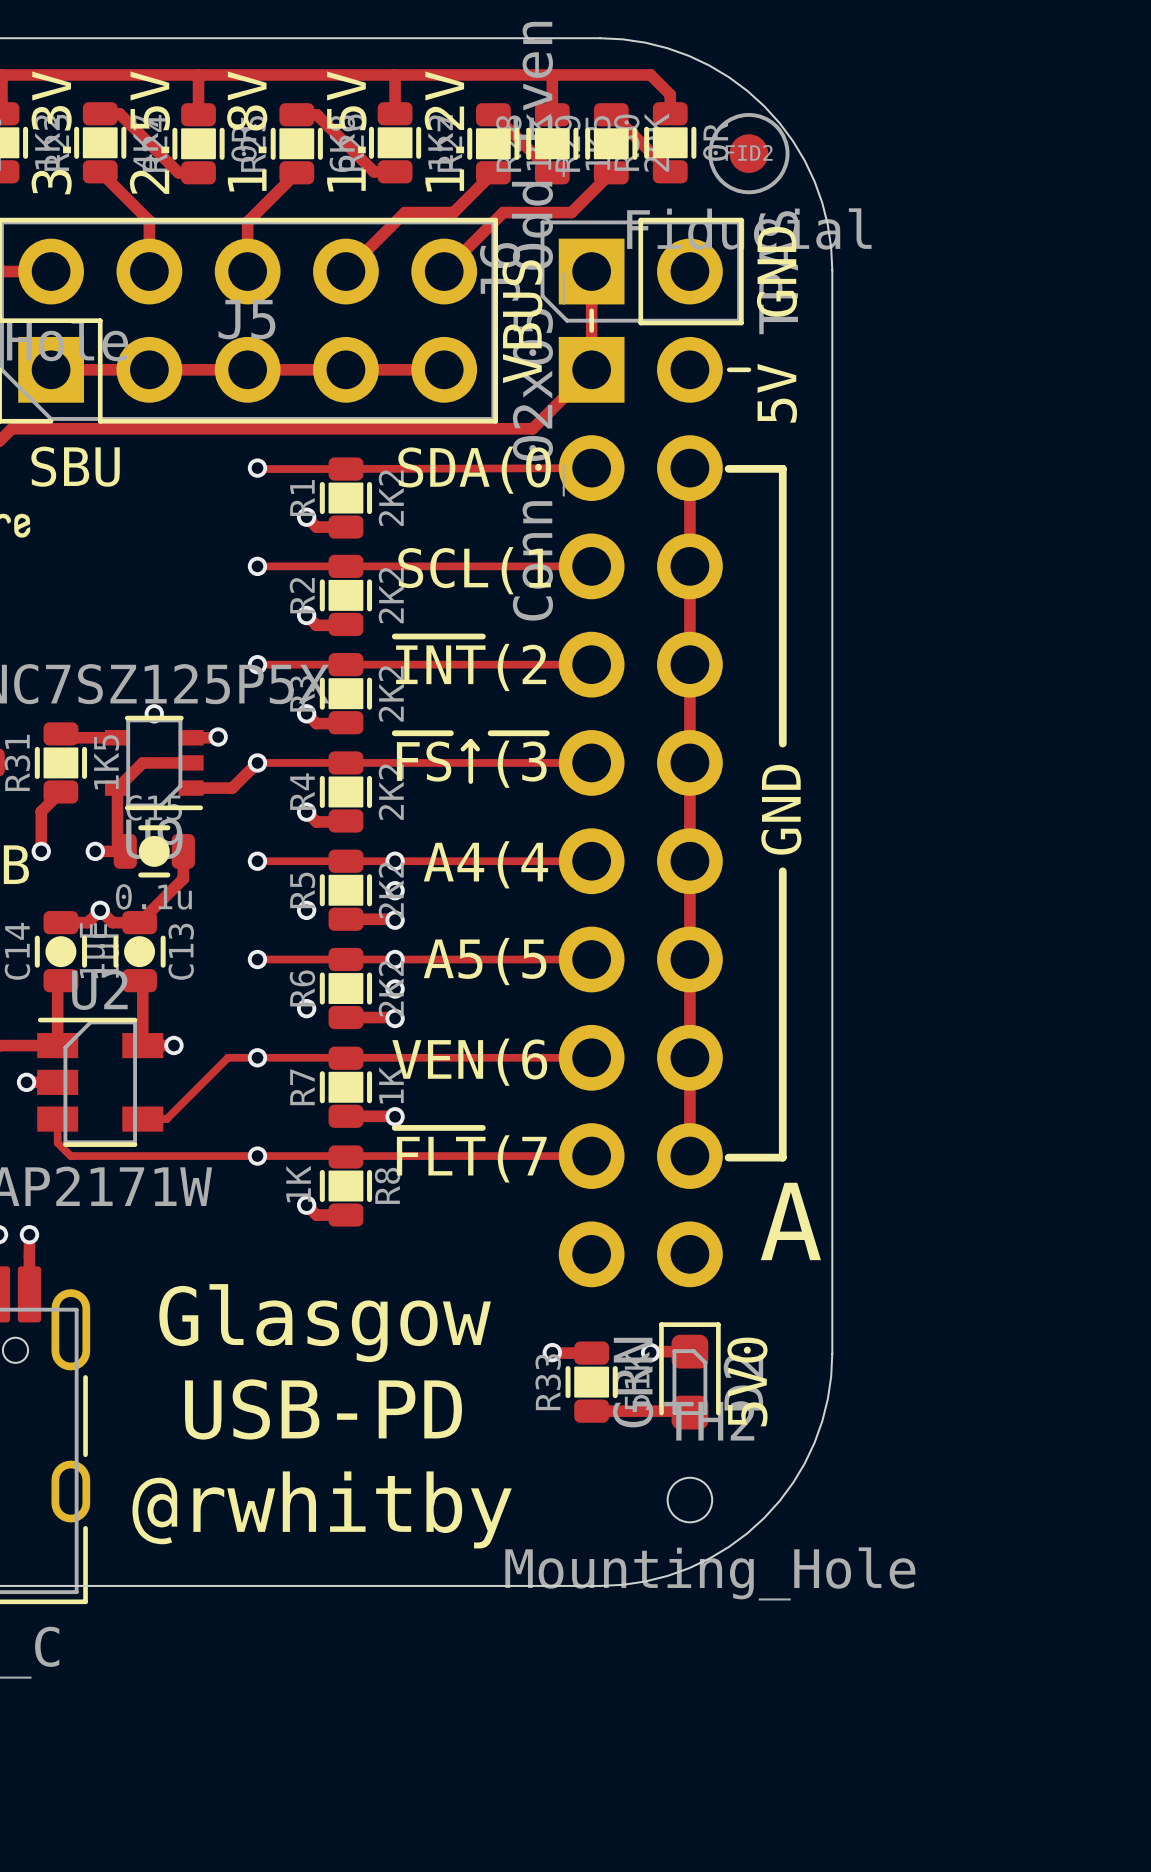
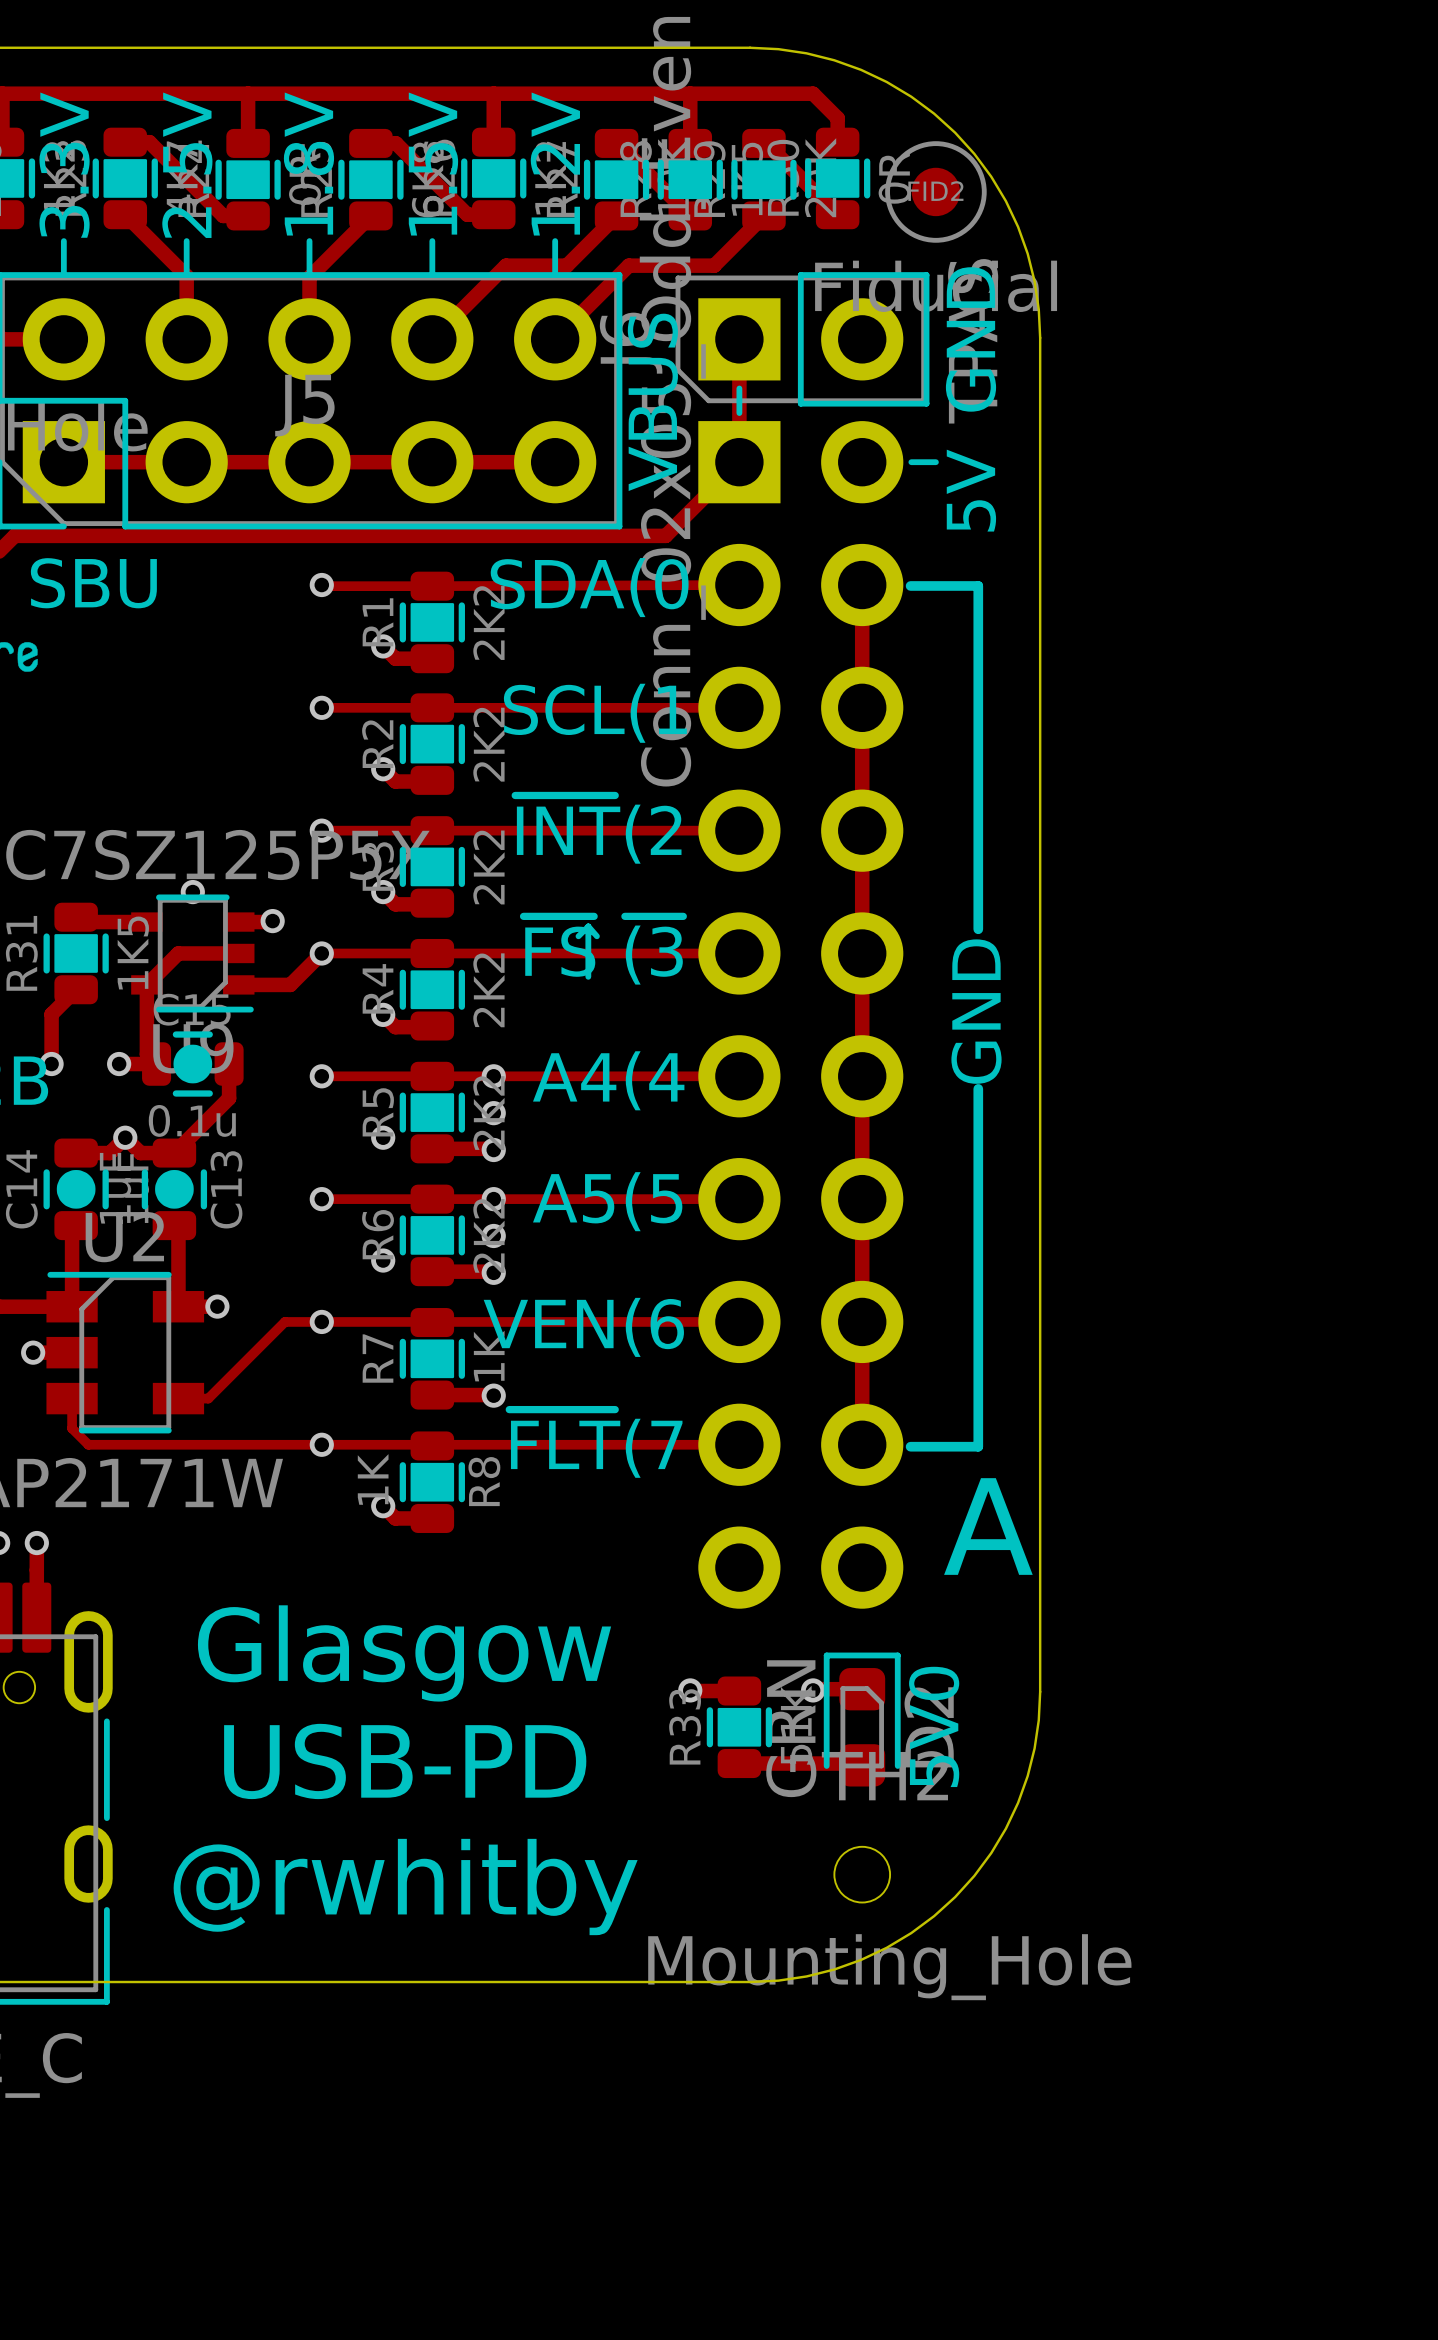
line: none -> (63, 241) (63, 271)
line: none -> (186, 241) (186, 271)
line: none -> (309, 241) (309, 271)
line: none -> (432, 241) (432, 271)
line: none -> (555, 241) (555, 271)

